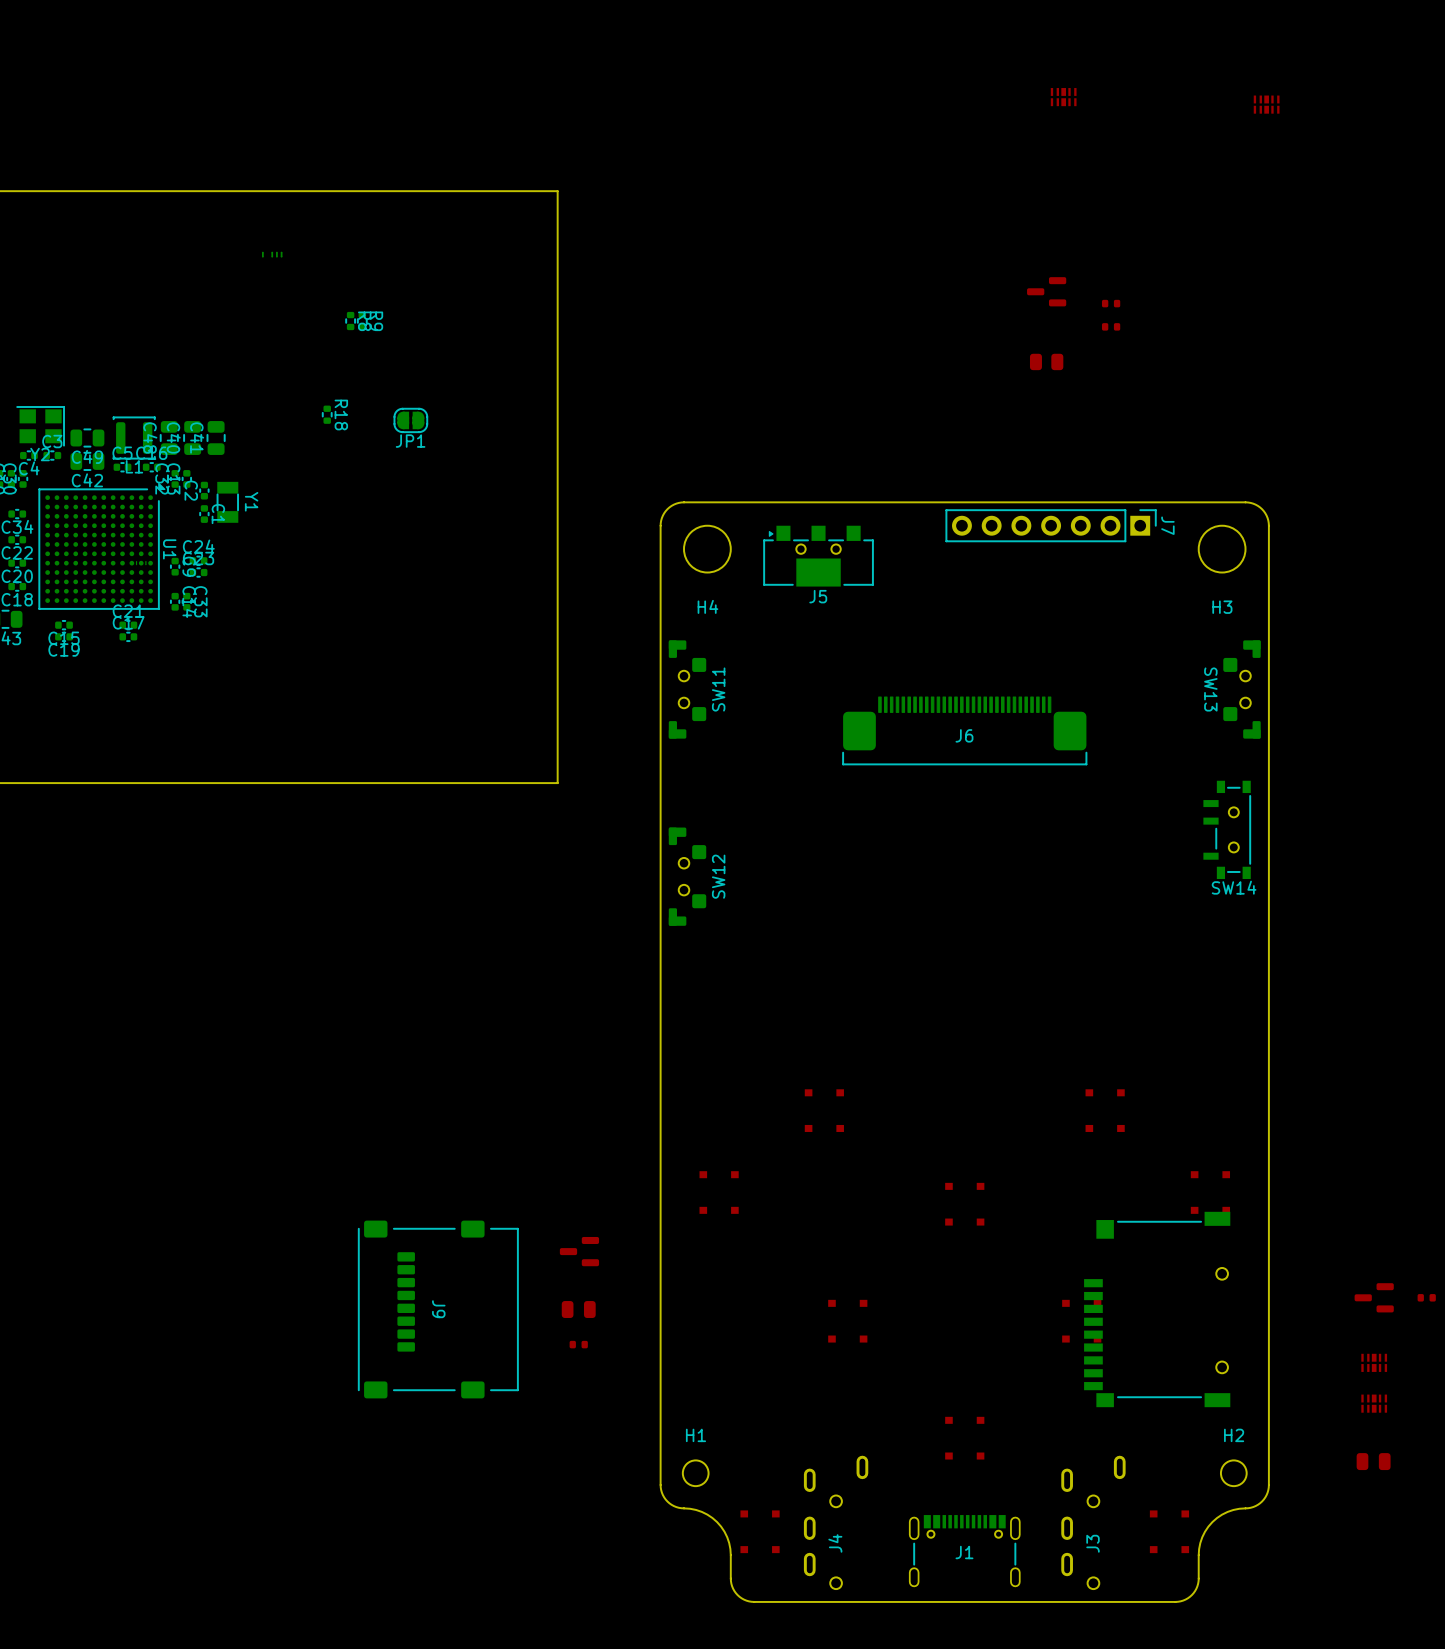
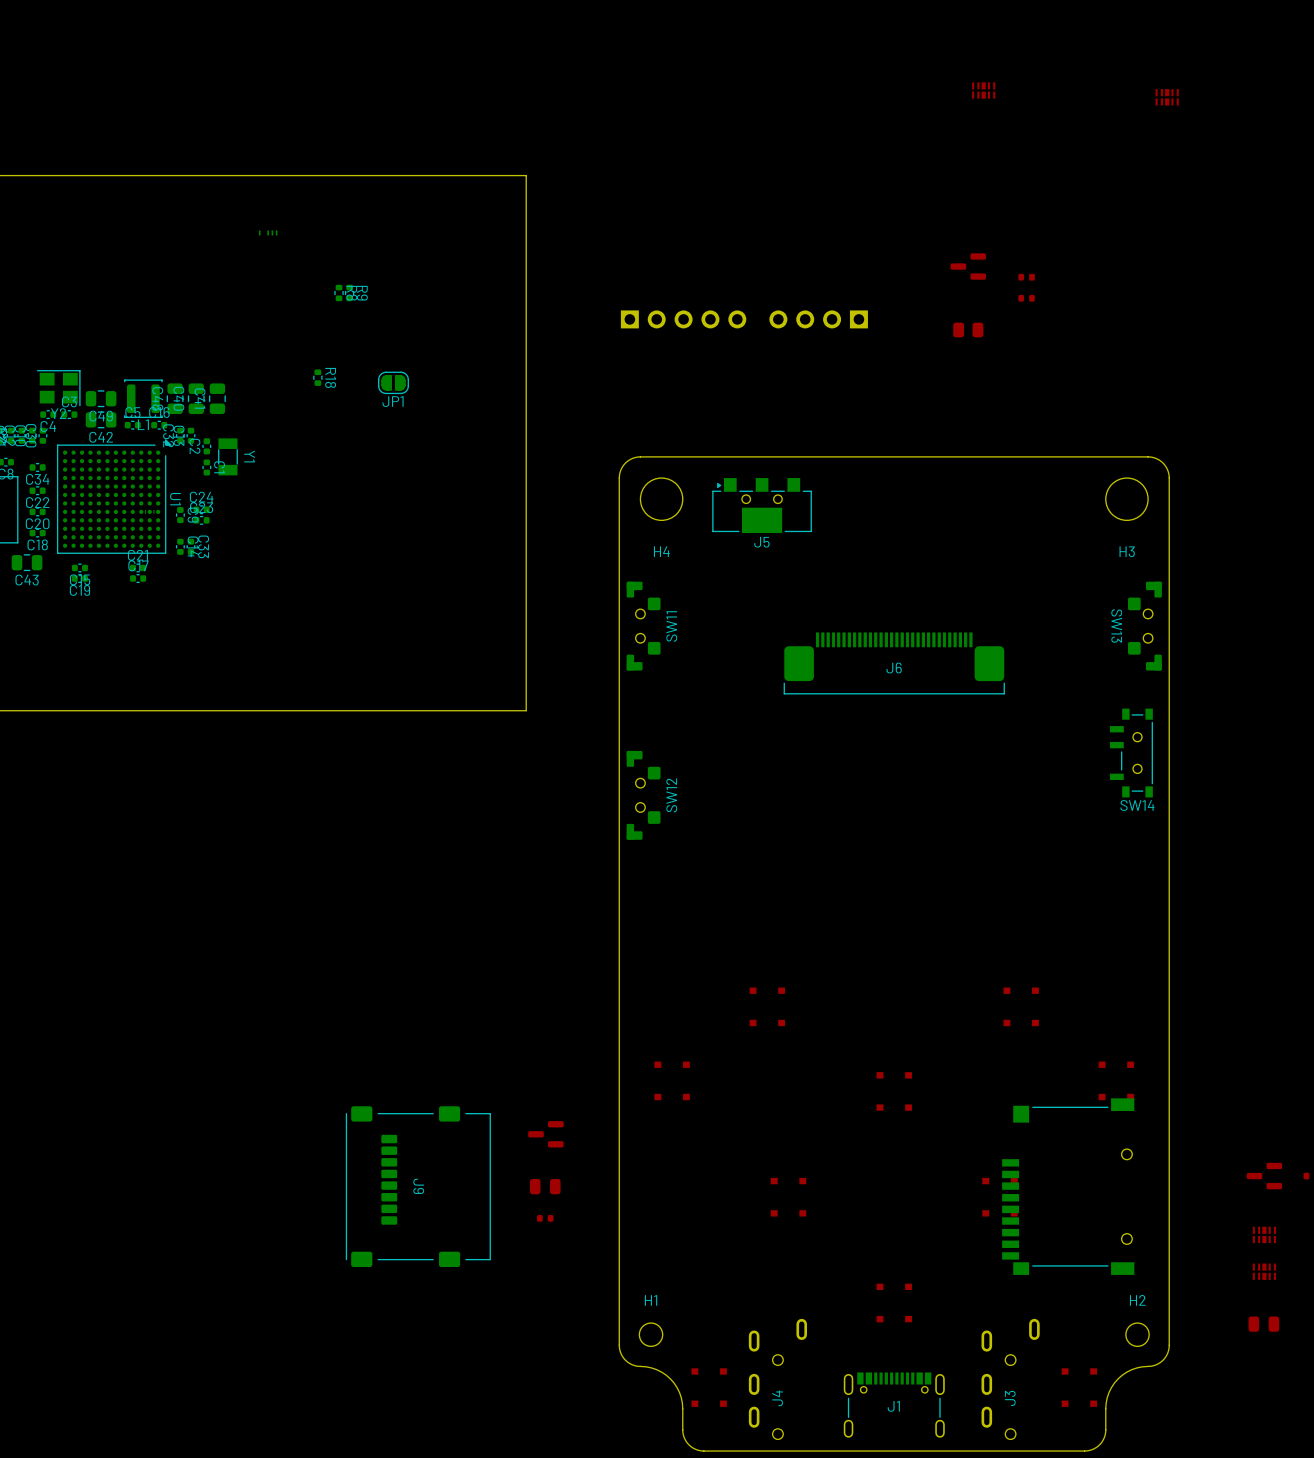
part: none -> (683, 319)
part: none -> (818, 319)
J7: (1051, 525) -> none

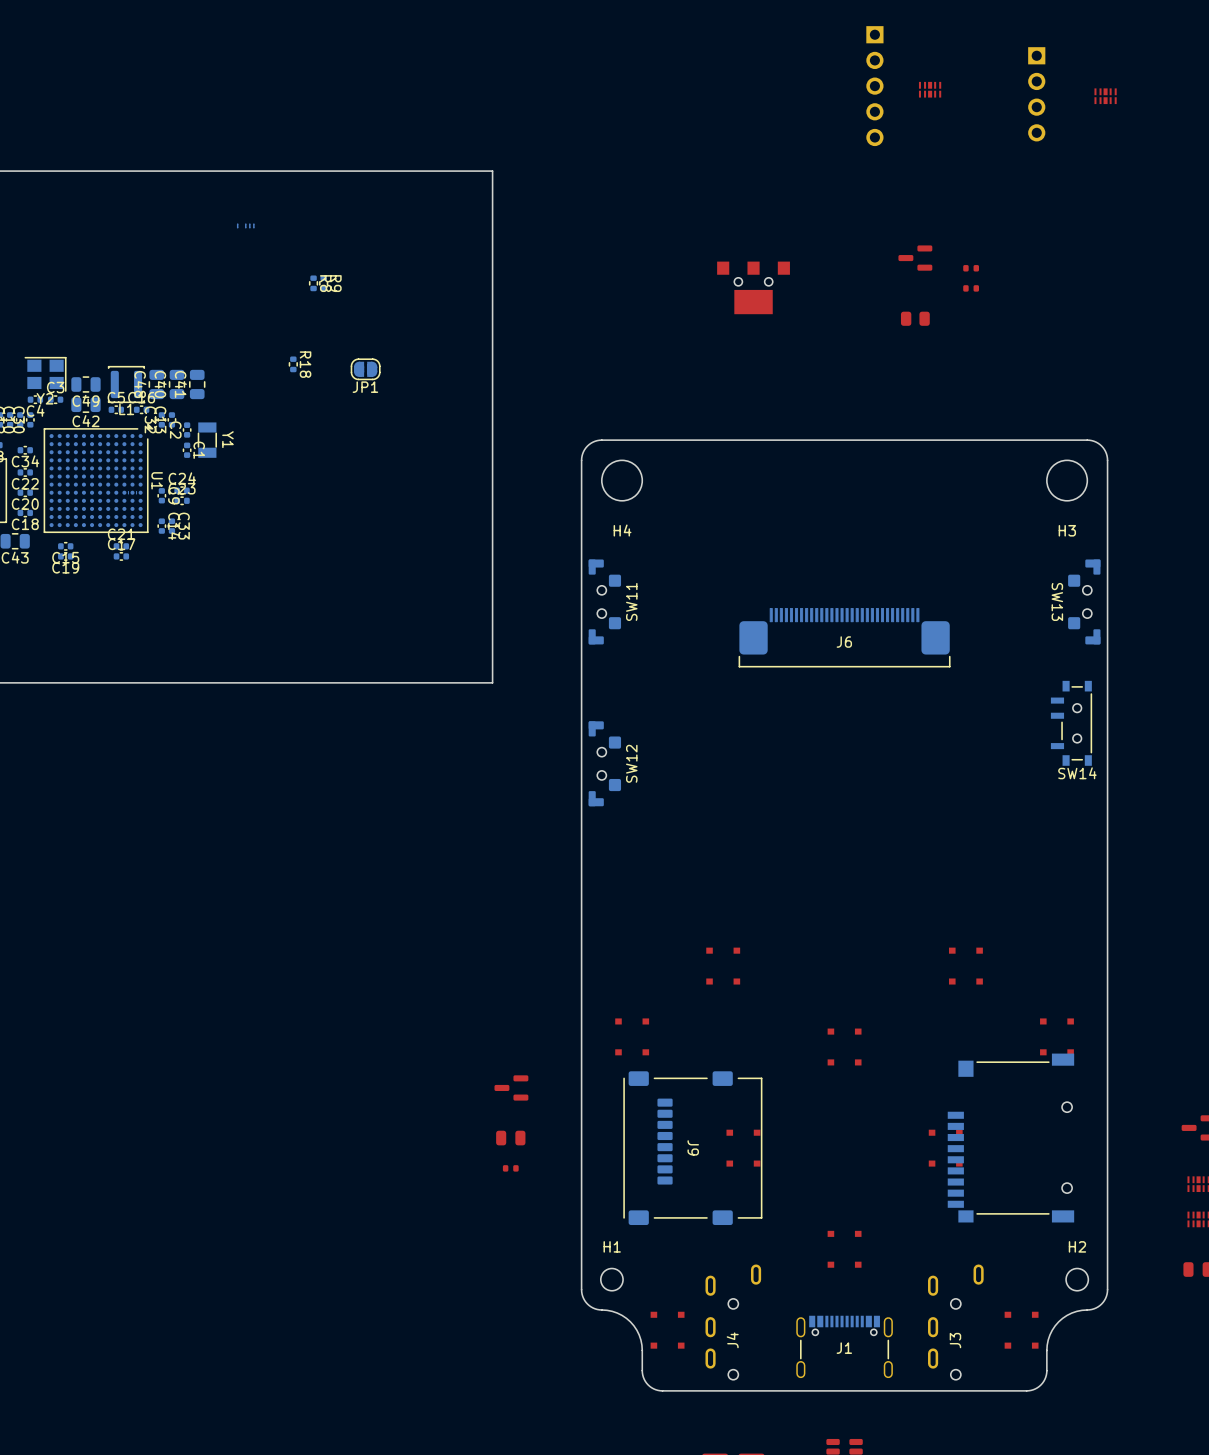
part: none -> (874, 86)
part: none -> (1036, 94)
part: (683, 319) -> none
part: (818, 319) -> none
J5 side: bottom (762, 505) -> top (753, 287)
J9 position: (418, 1186) -> (692, 1148)

